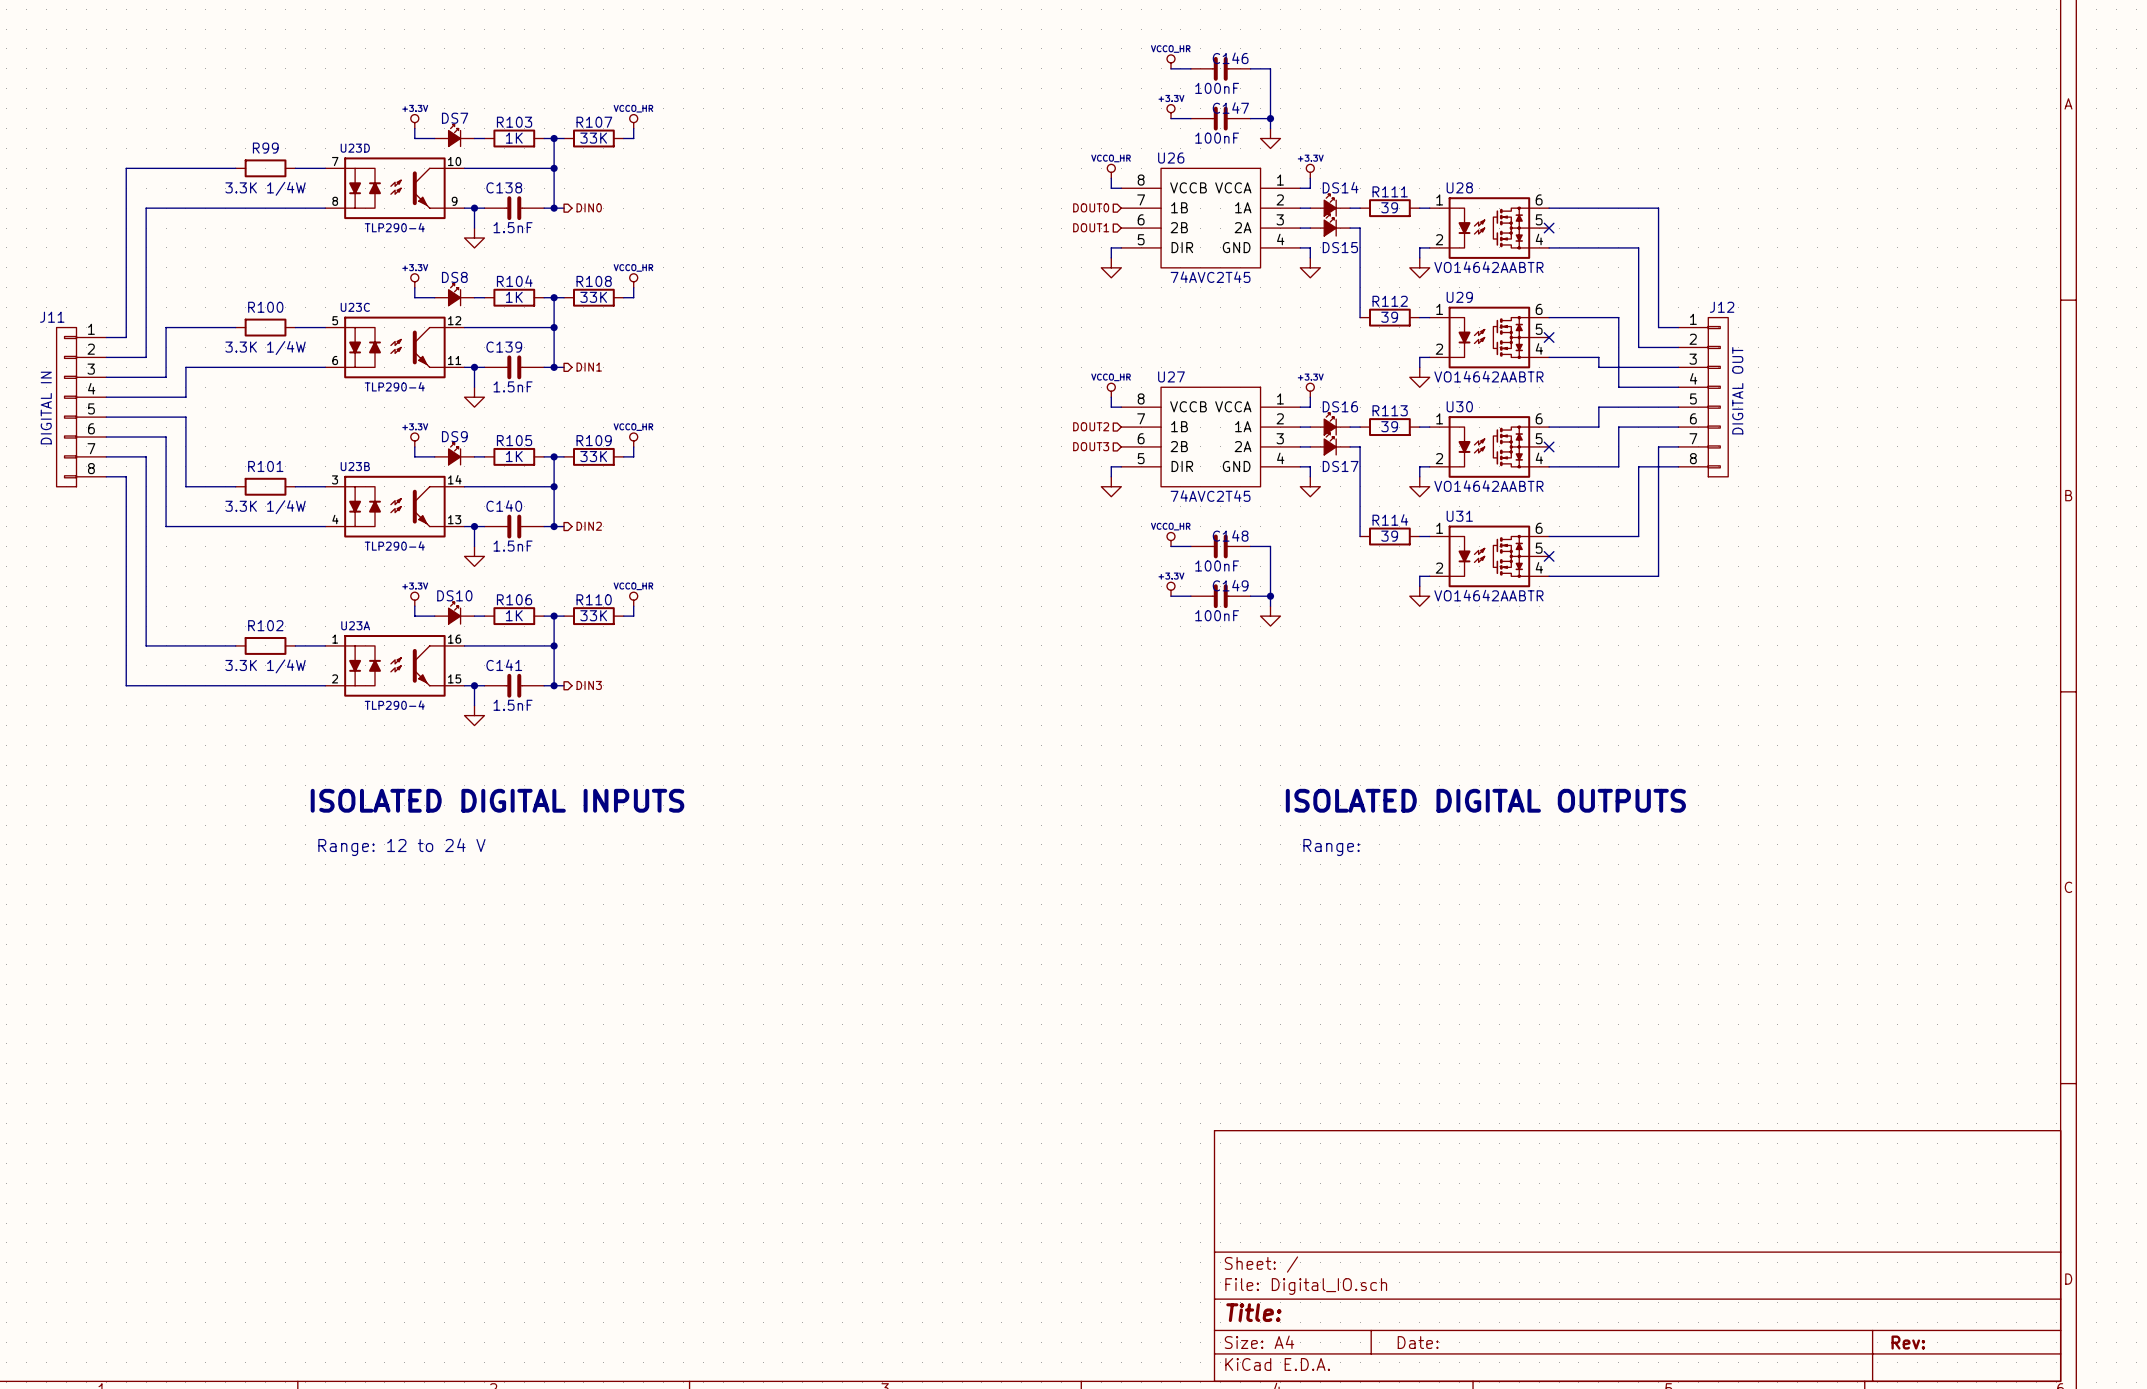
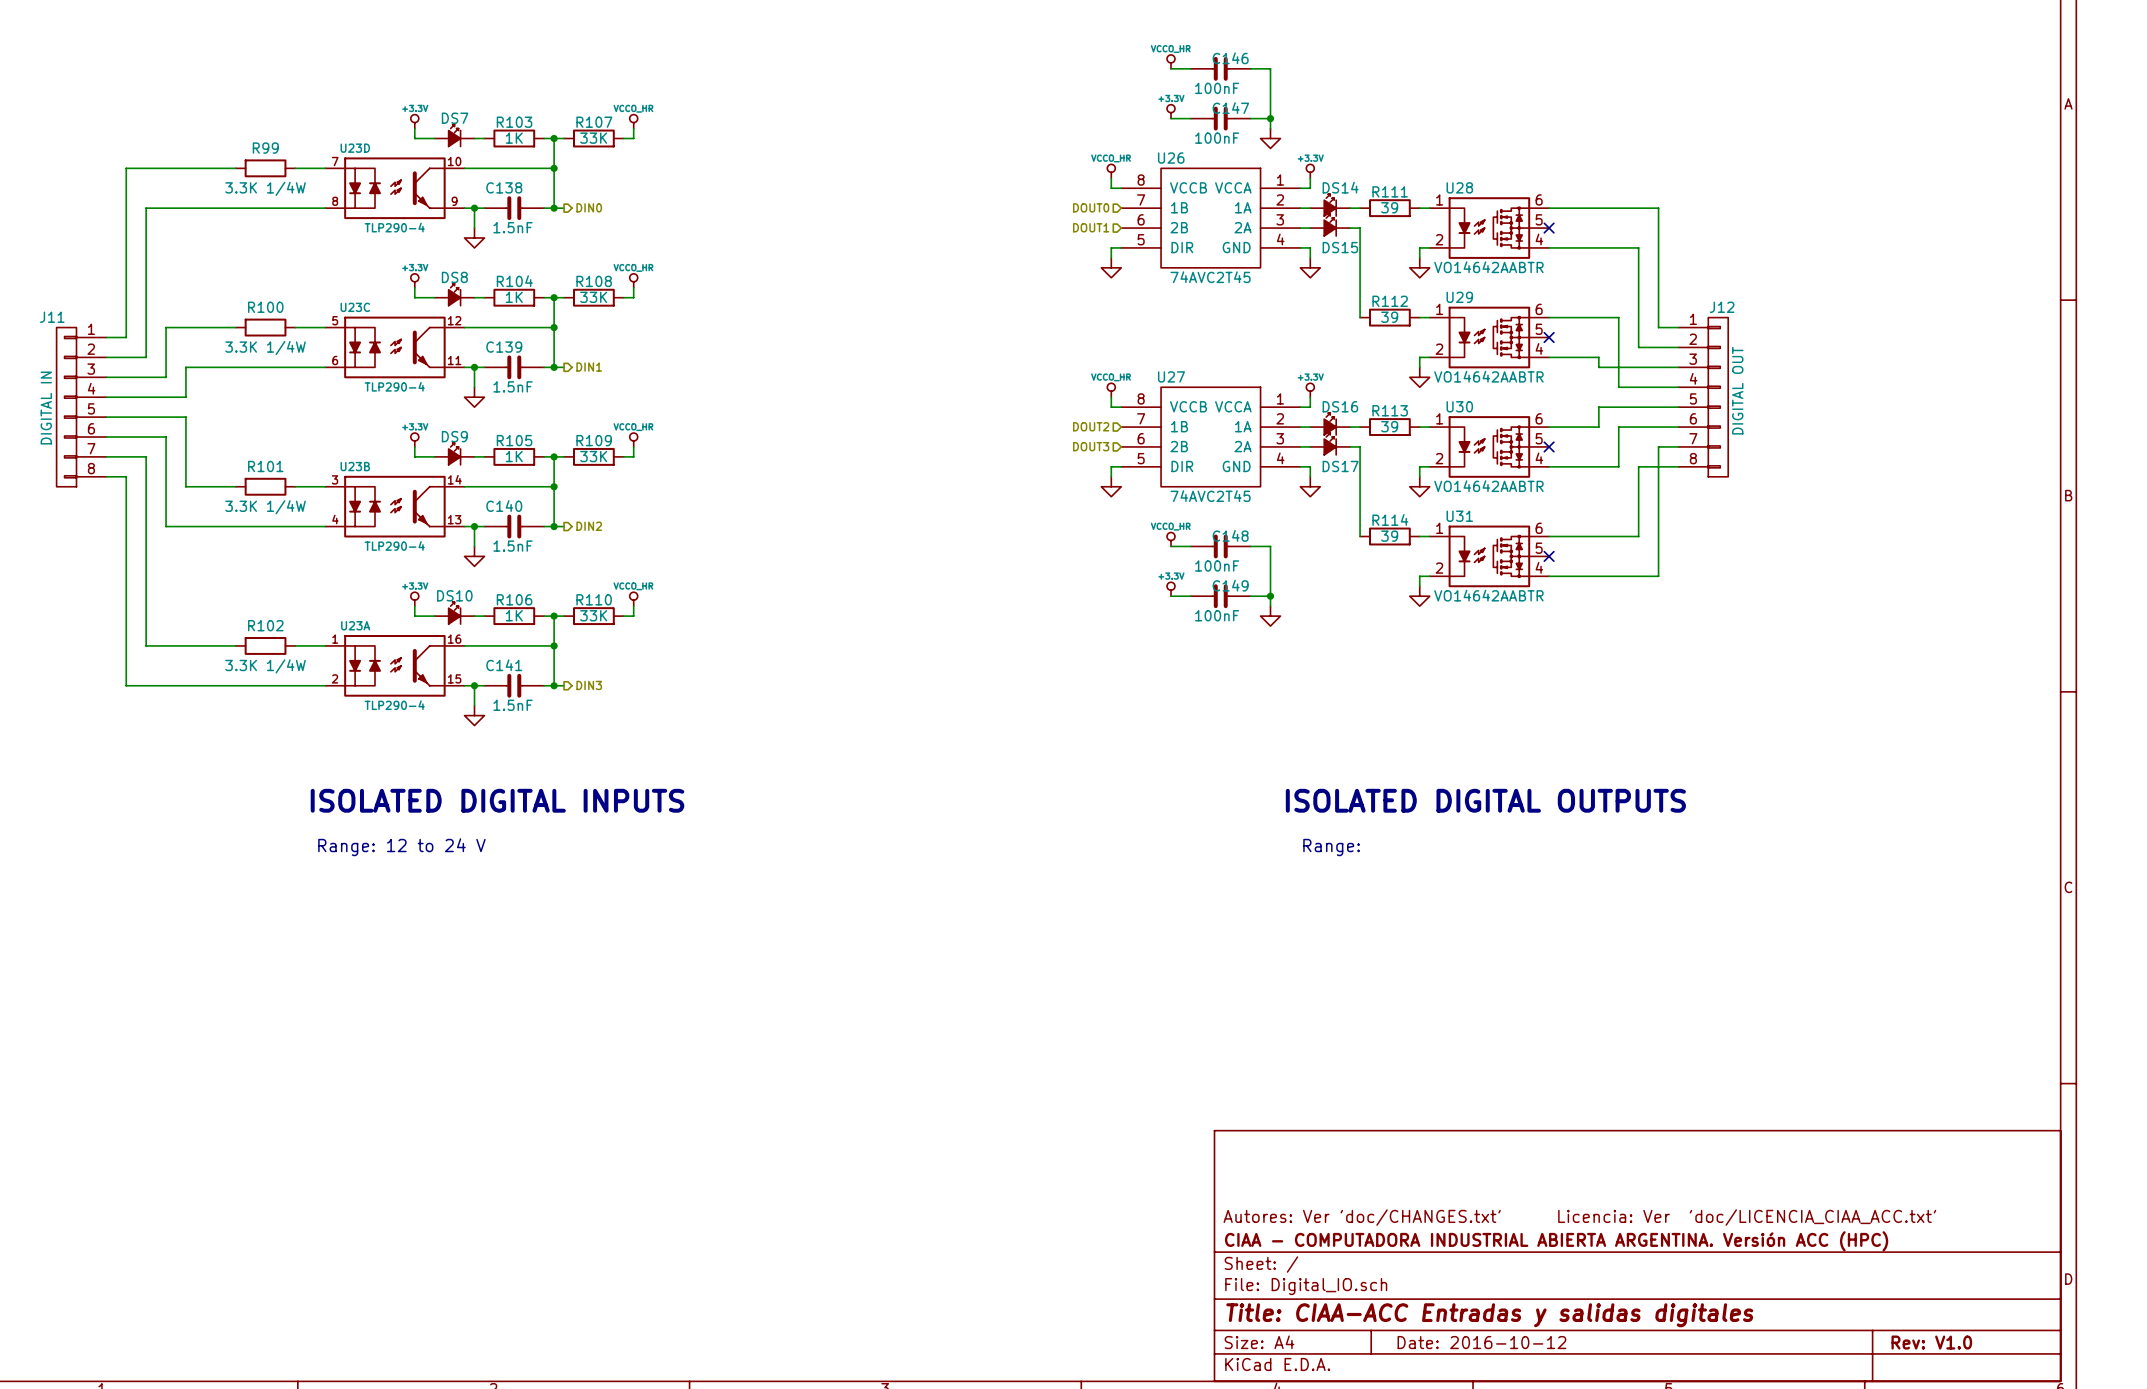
title block: none -> Autores: Ver 'doc/CHANGES.txt' Licencia: Ver 'doc/LICENCIA_CIAA_ACC.txt' (1579, 1217)
title block: none -> CIAA - COMPUTADORA INDUSTRIAL ABIERTA ARGENTINA. Versión ACC (HPC) (1556, 1241)
title block: Title: (1253, 1312) -> Title: CIAA-ACC Entradas y salidas digitales (1489, 1315)
title block: Date: (1418, 1342) -> Date: 2016-10-12 (1481, 1342)
title block: Rev: (1908, 1342) -> Rev: V1.0 (1931, 1342)

